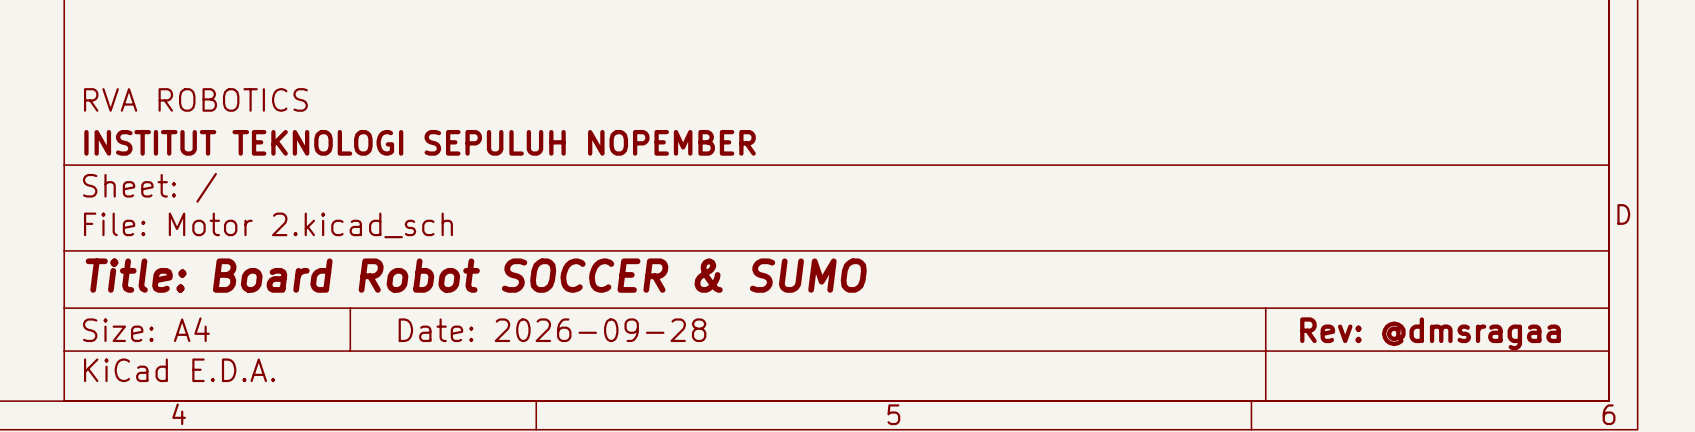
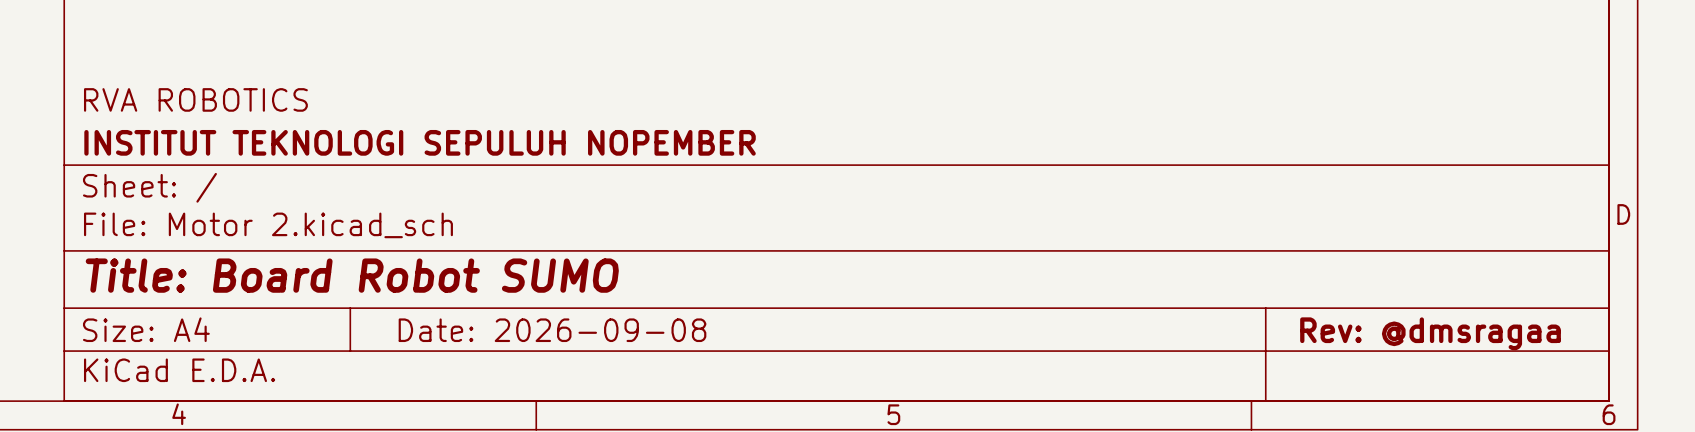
title block: Title: Board Robot SOCCER & SUMO (476, 275) -> Title: Board Robot SUMO (352, 275)
title block: Date: 2026-09-28 (552, 330) -> Date: 2026-09-08 (552, 330)

